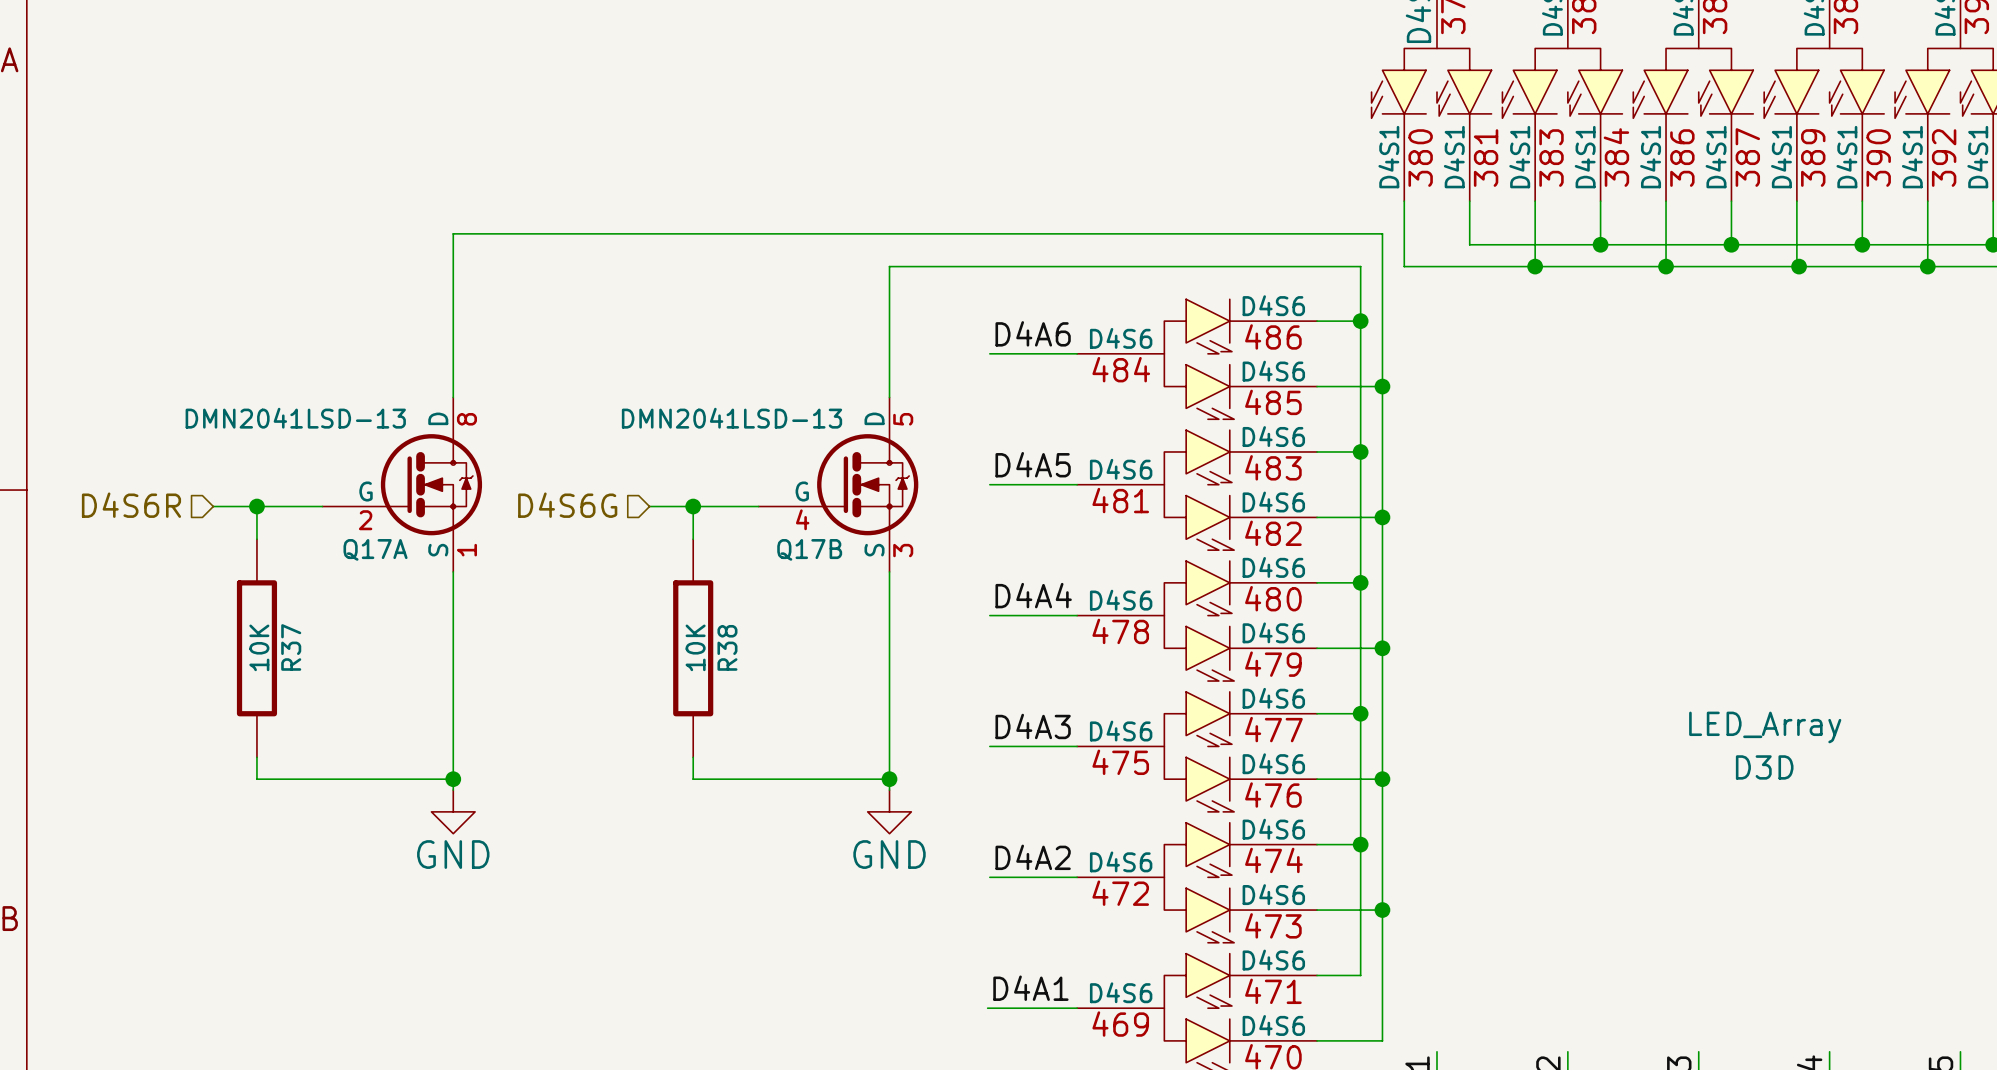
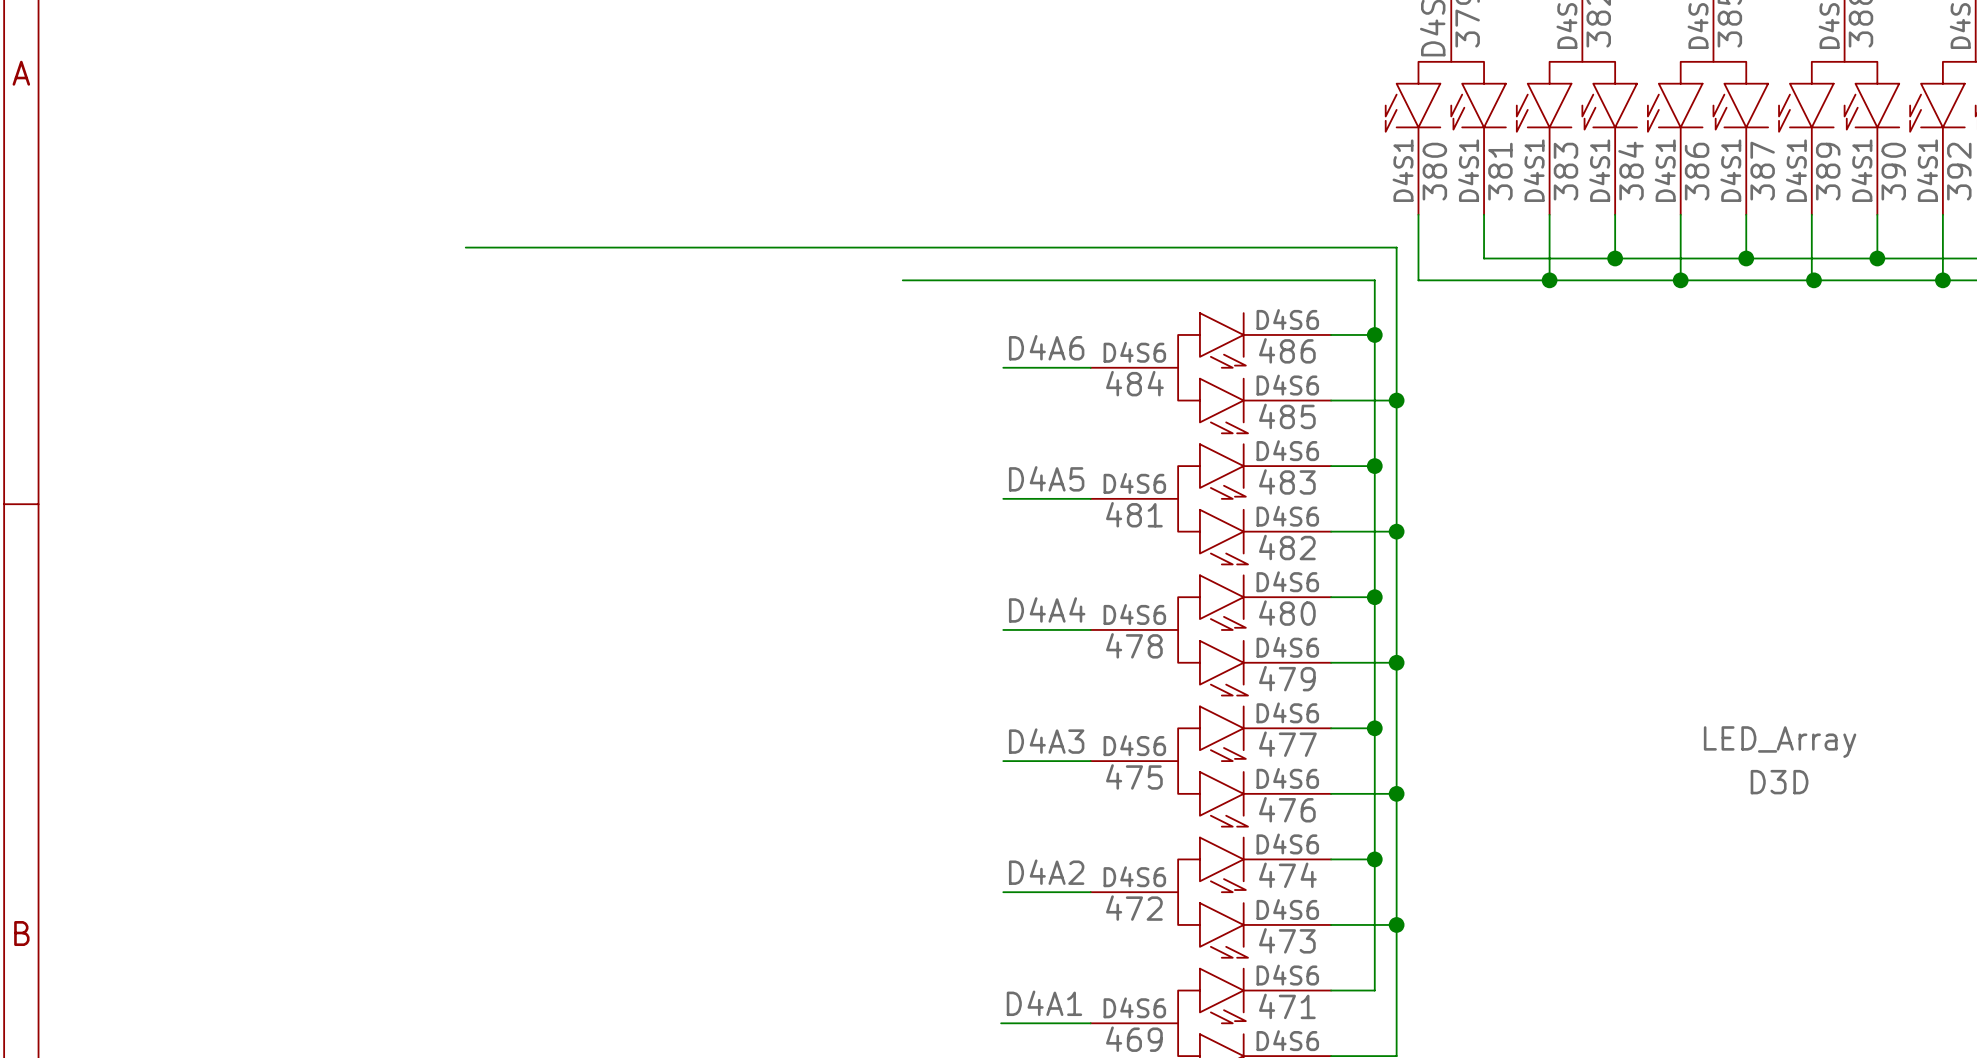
wire: (453, 233) (453, 397) -> none
wire: (889, 266) (889, 397) -> none
Q17A: DMN2041LSD-13 (402, 484) -> none
Q17B: DMN2041LSD-13 (838, 484) -> none
hierarchical label: D4S6R (131, 505) -> none
hierarchical label: D4S6G (567, 505) -> none
wire: (213, 506) (322, 506) -> none
wire: (256, 506) (256, 539) -> none
junction: (256, 506) -> none
wire: (649, 506) (758, 506) -> none
wire: (693, 506) (693, 539) -> none
junction: (693, 506) -> none
wire: (453, 571) (453, 790) -> none
wire: (889, 571) (889, 790) -> none
R37: 10K (256, 648) -> none
R38: 10K (693, 648) -> none
wire: (256, 757) (256, 779) (453, 779) -> none
wire: (693, 757) (693, 779) (889, 779) -> none
junction: (453, 779) -> none
junction: (889, 779) -> none
power symbol: GND (453, 811) -> none
power symbol: GND (889, 811) -> none

